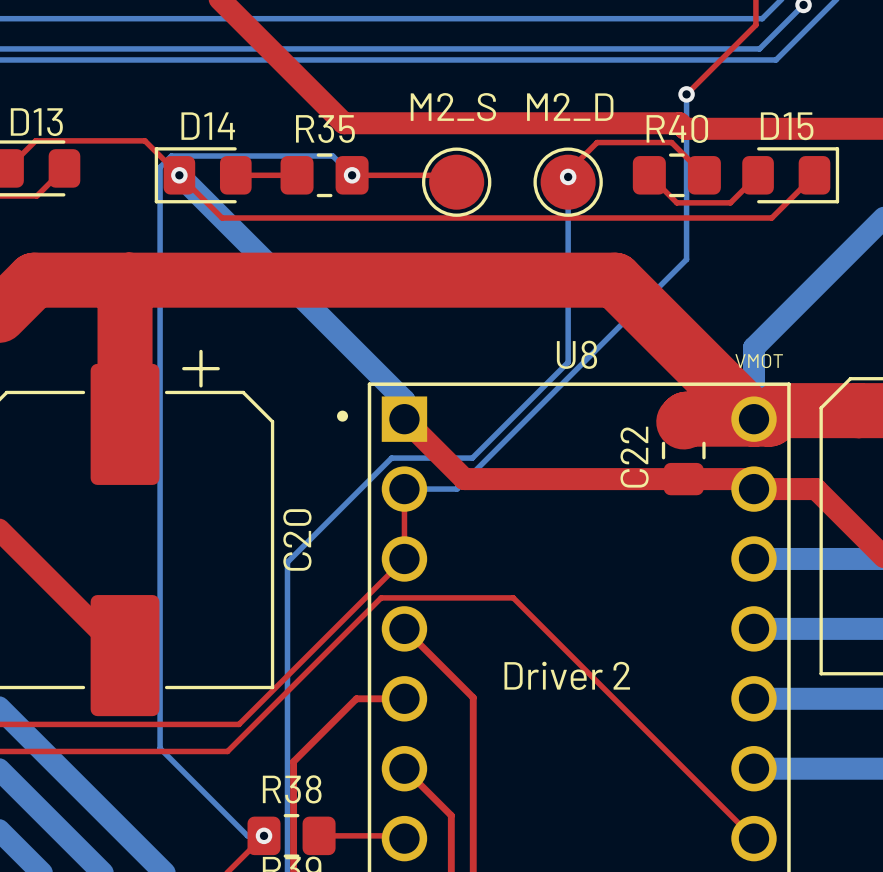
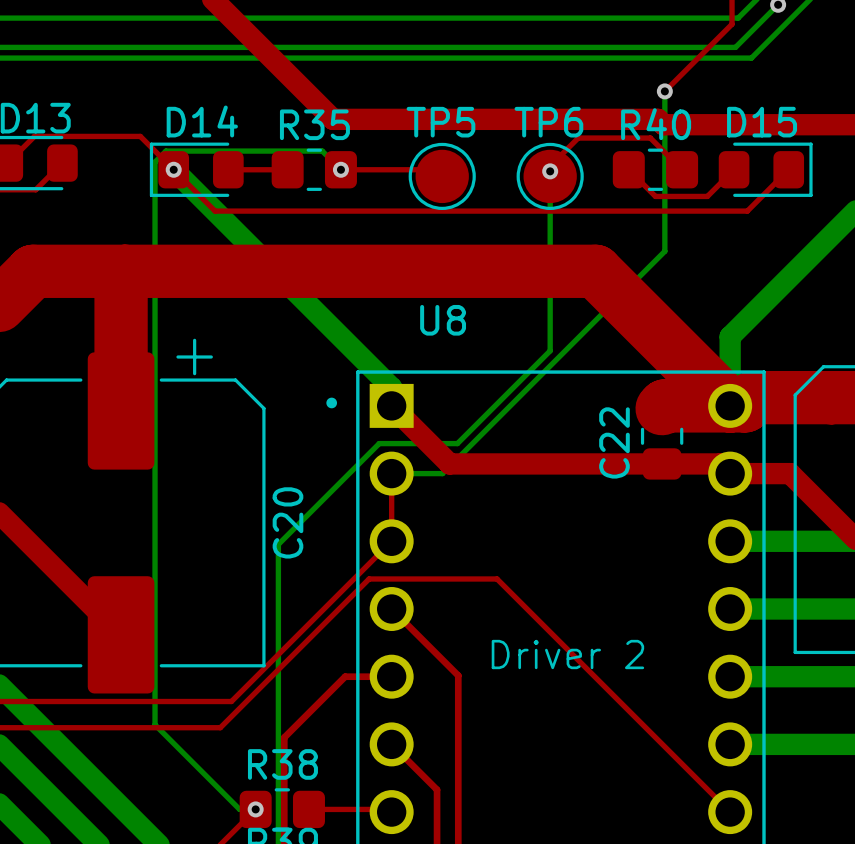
M2_D name: M2_D (570, 106) -> TP6 (548, 122)
M2_S name: M2_S (453, 107) -> TP5 (440, 122)
U8 name position: U8 (576, 354) -> U8 (443, 320)
text: VMOT (759, 361) -> none

